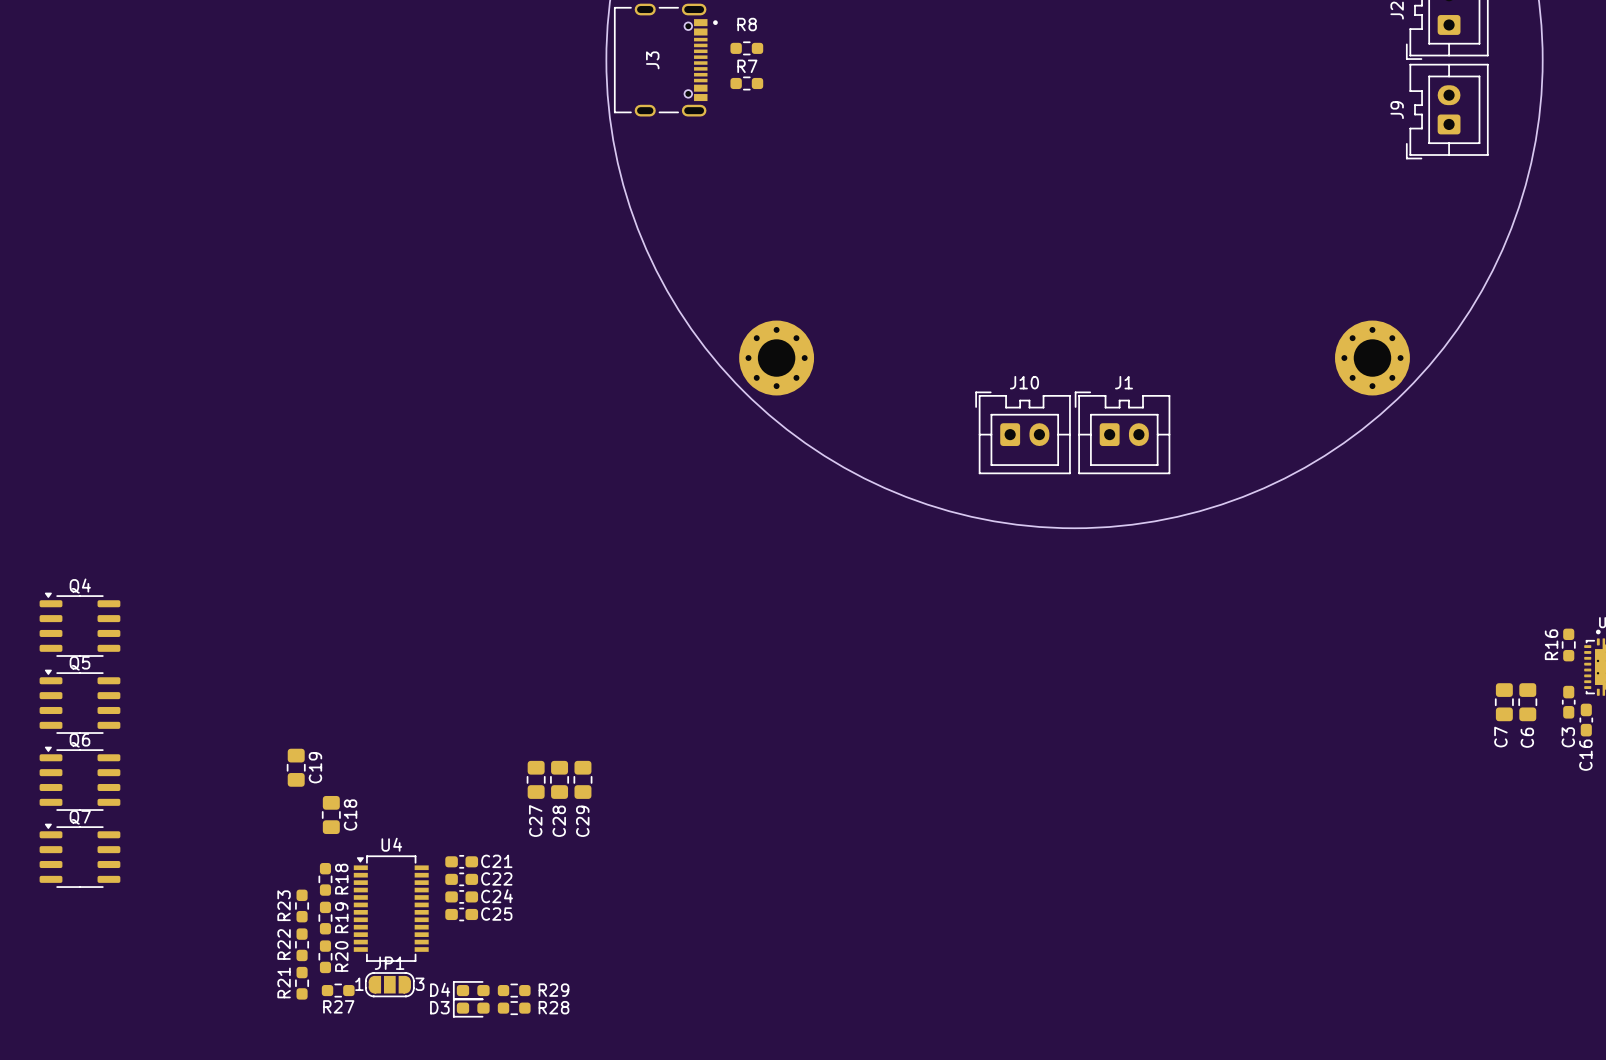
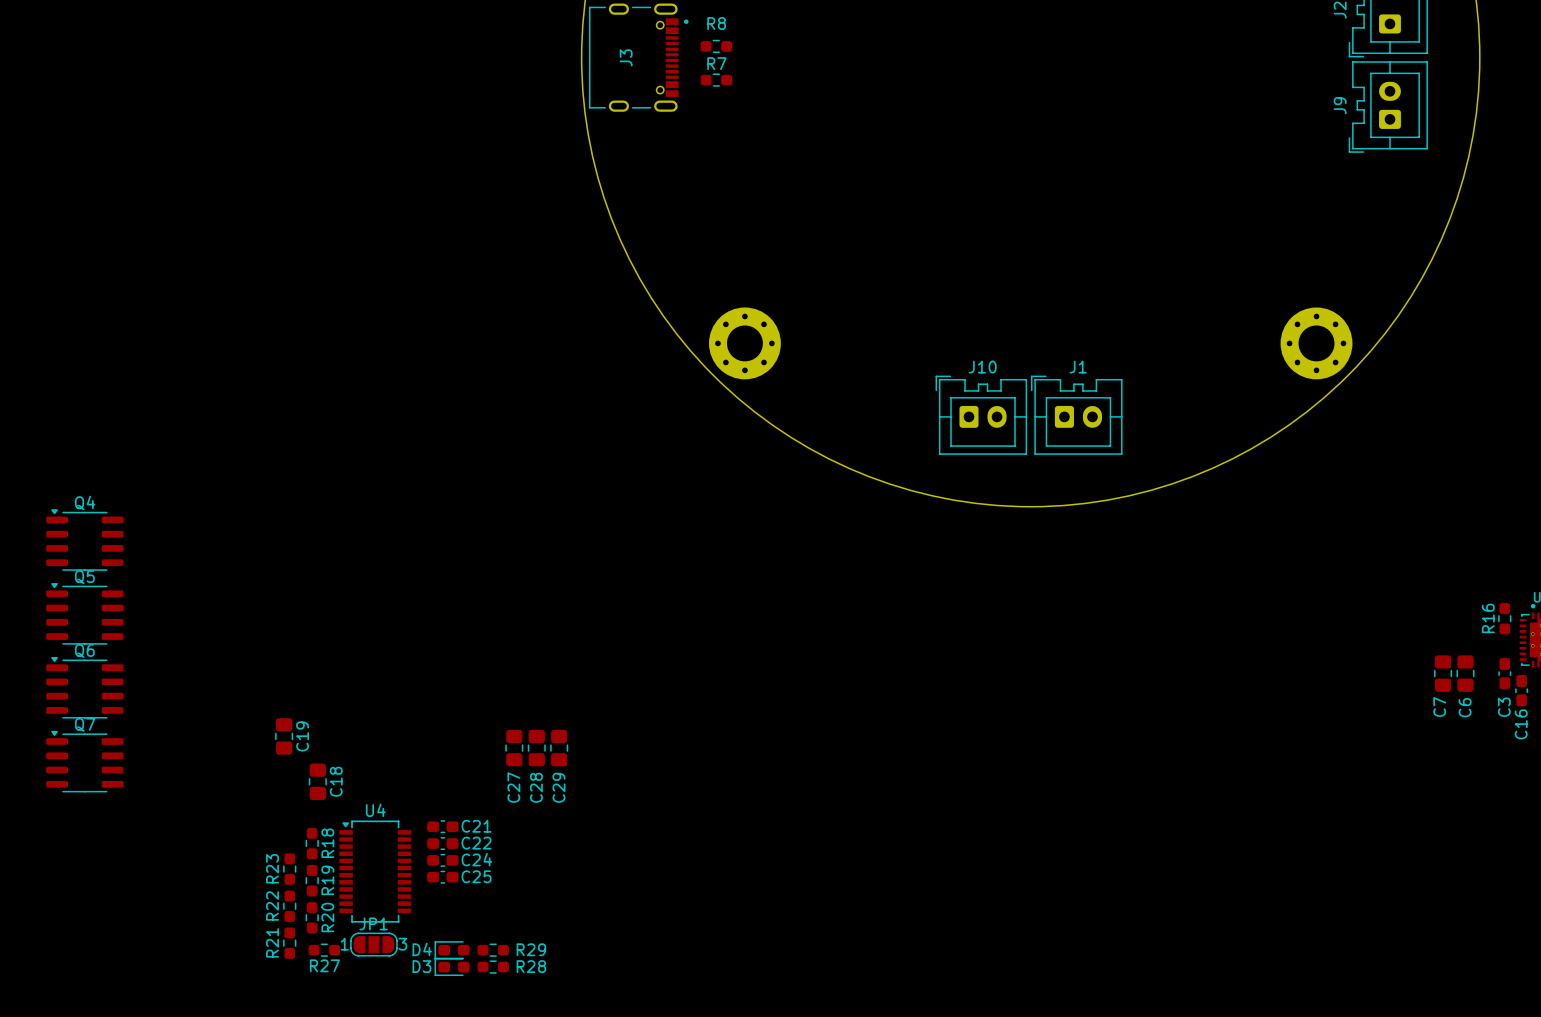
Q4 position: (79, 624) -> (84, 539)
Q5 position: (79, 701) -> (84, 613)
Q6 position: (79, 778) -> (84, 687)
Q7 position: (79, 855) -> (84, 761)

